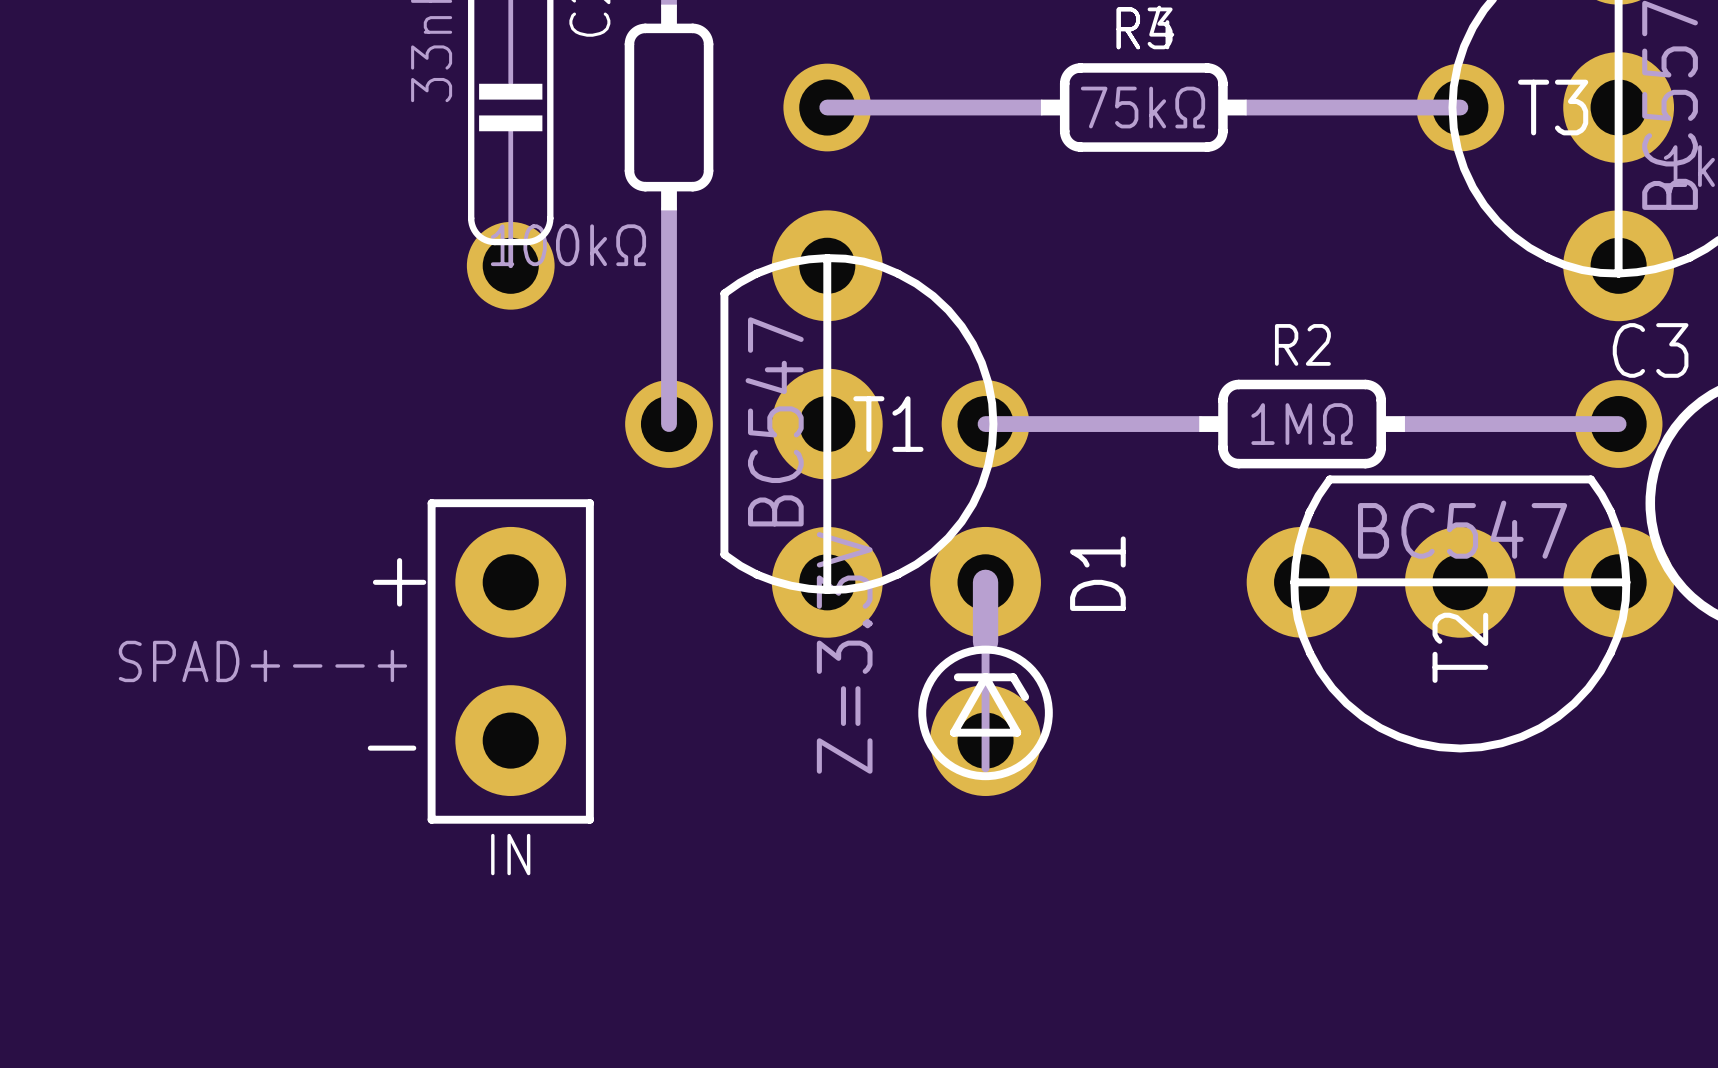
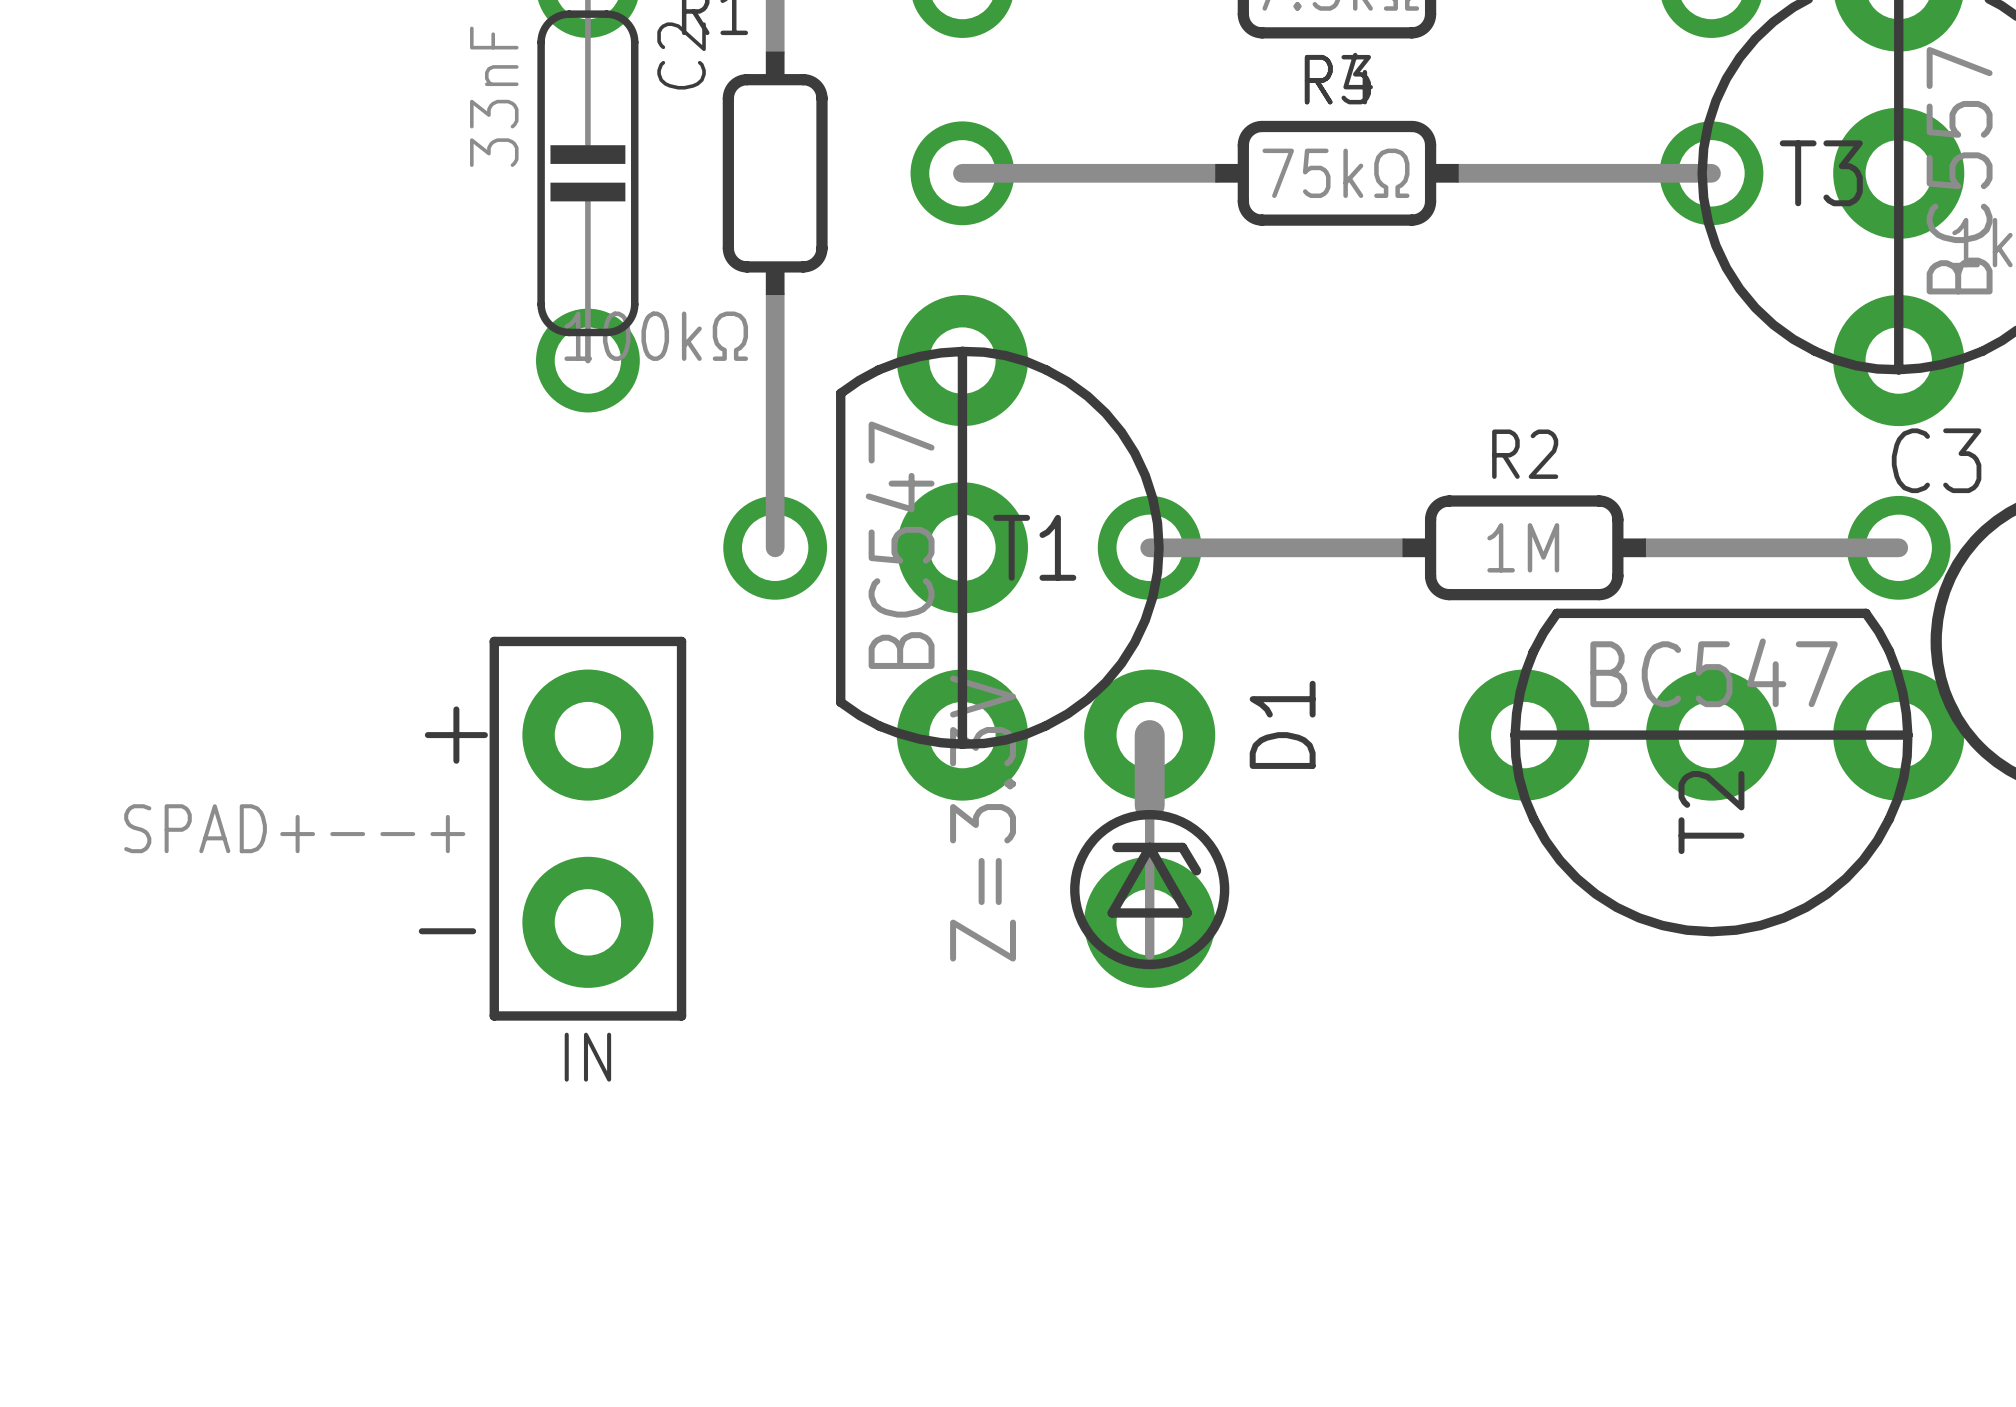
R2 value: 1MΩ (1302, 424) -> 1M (1523, 547)

